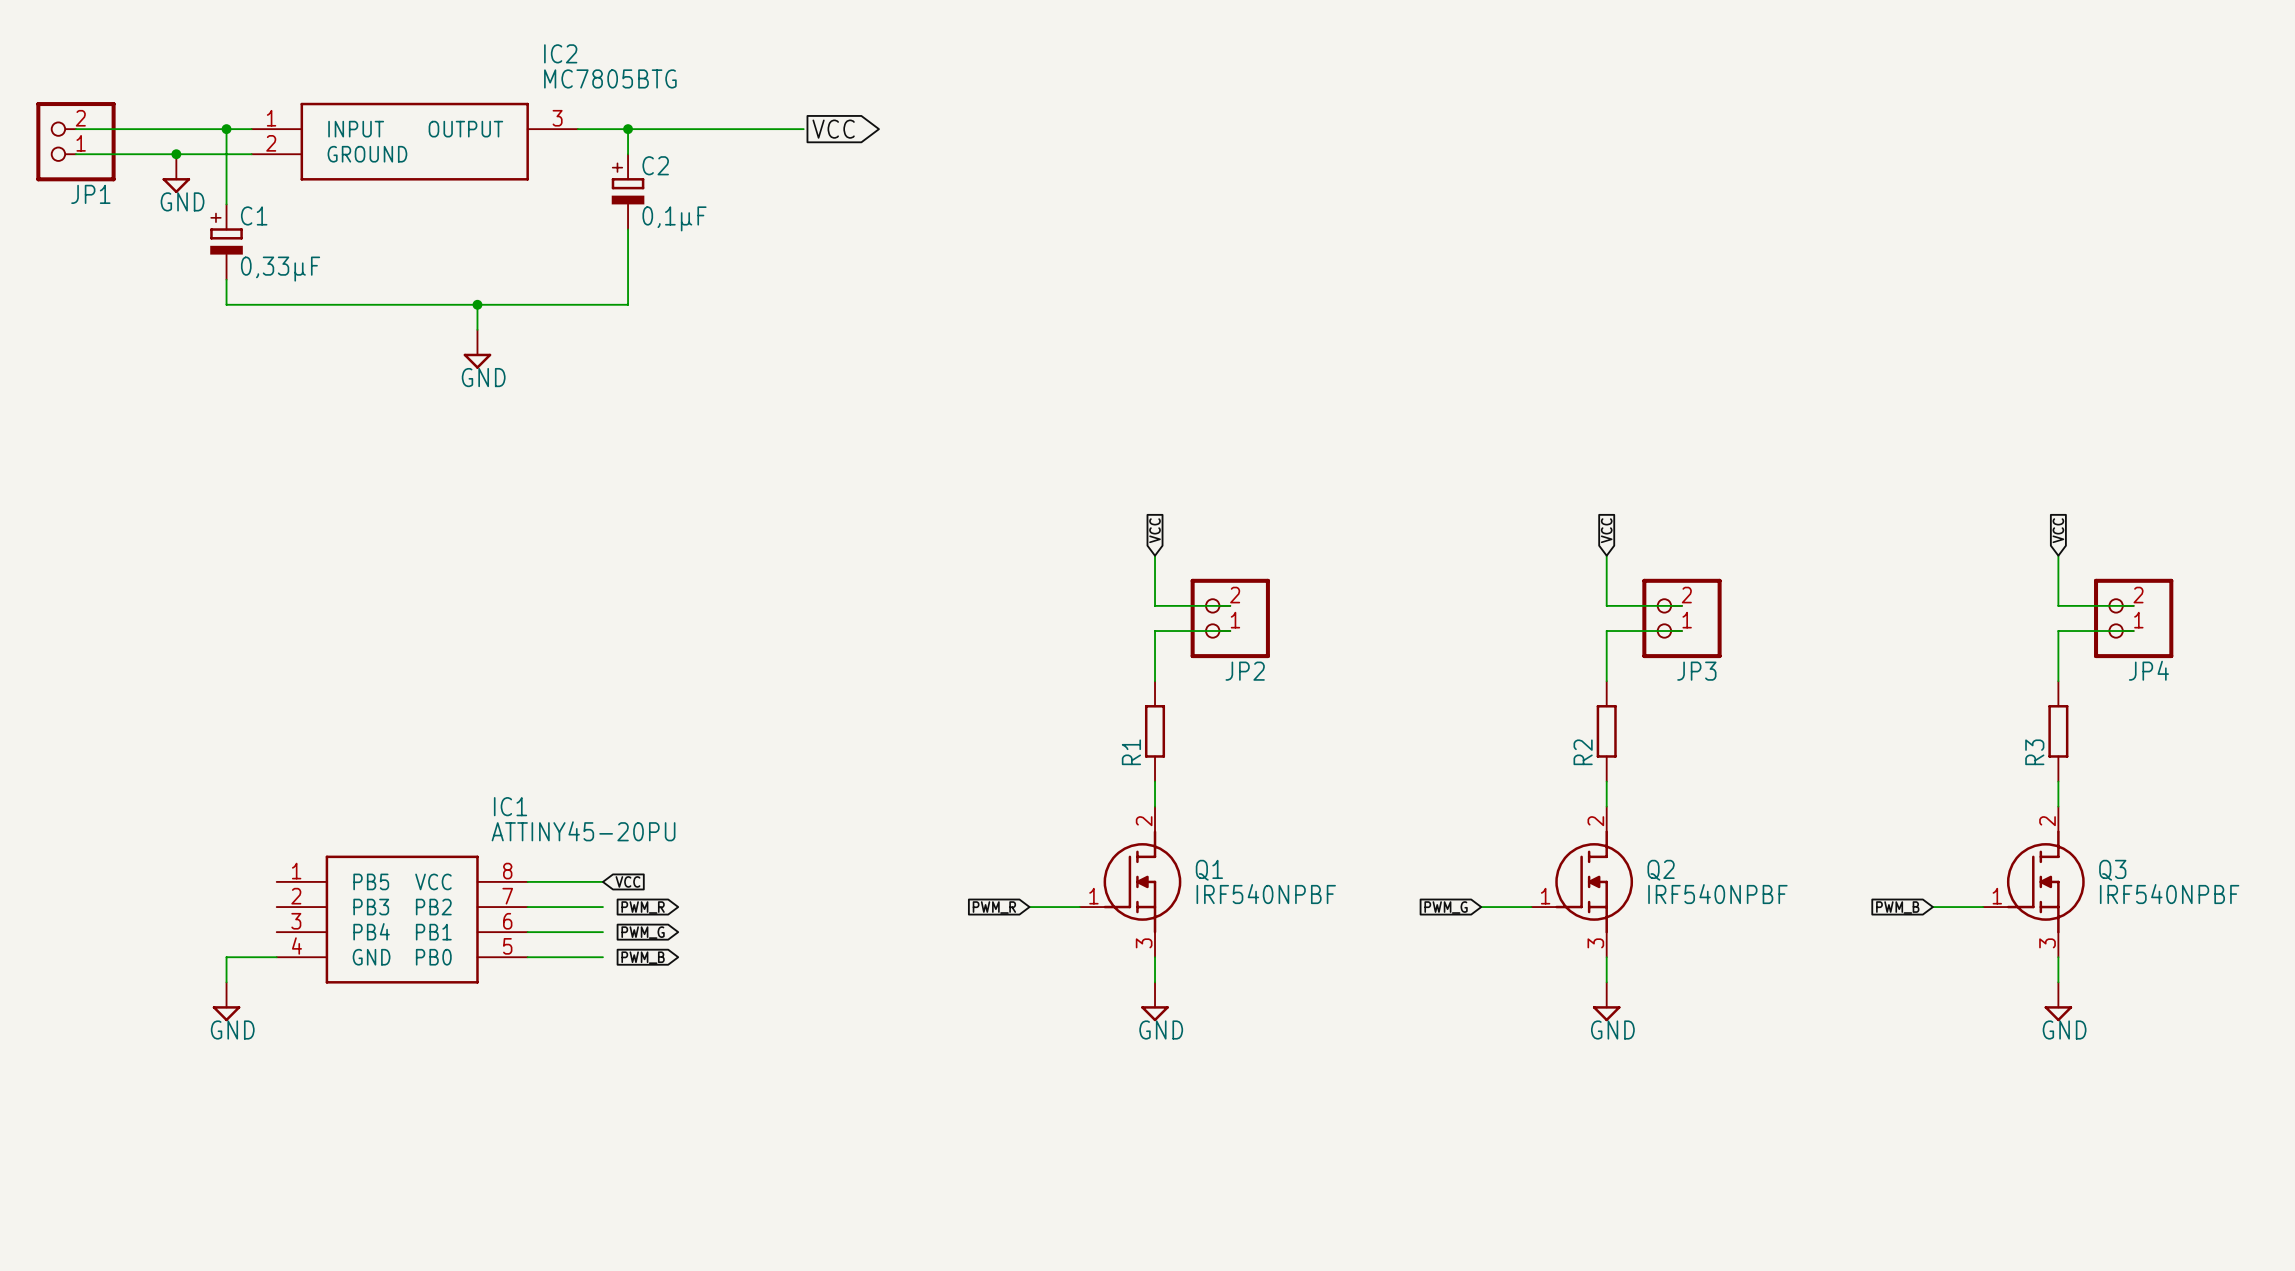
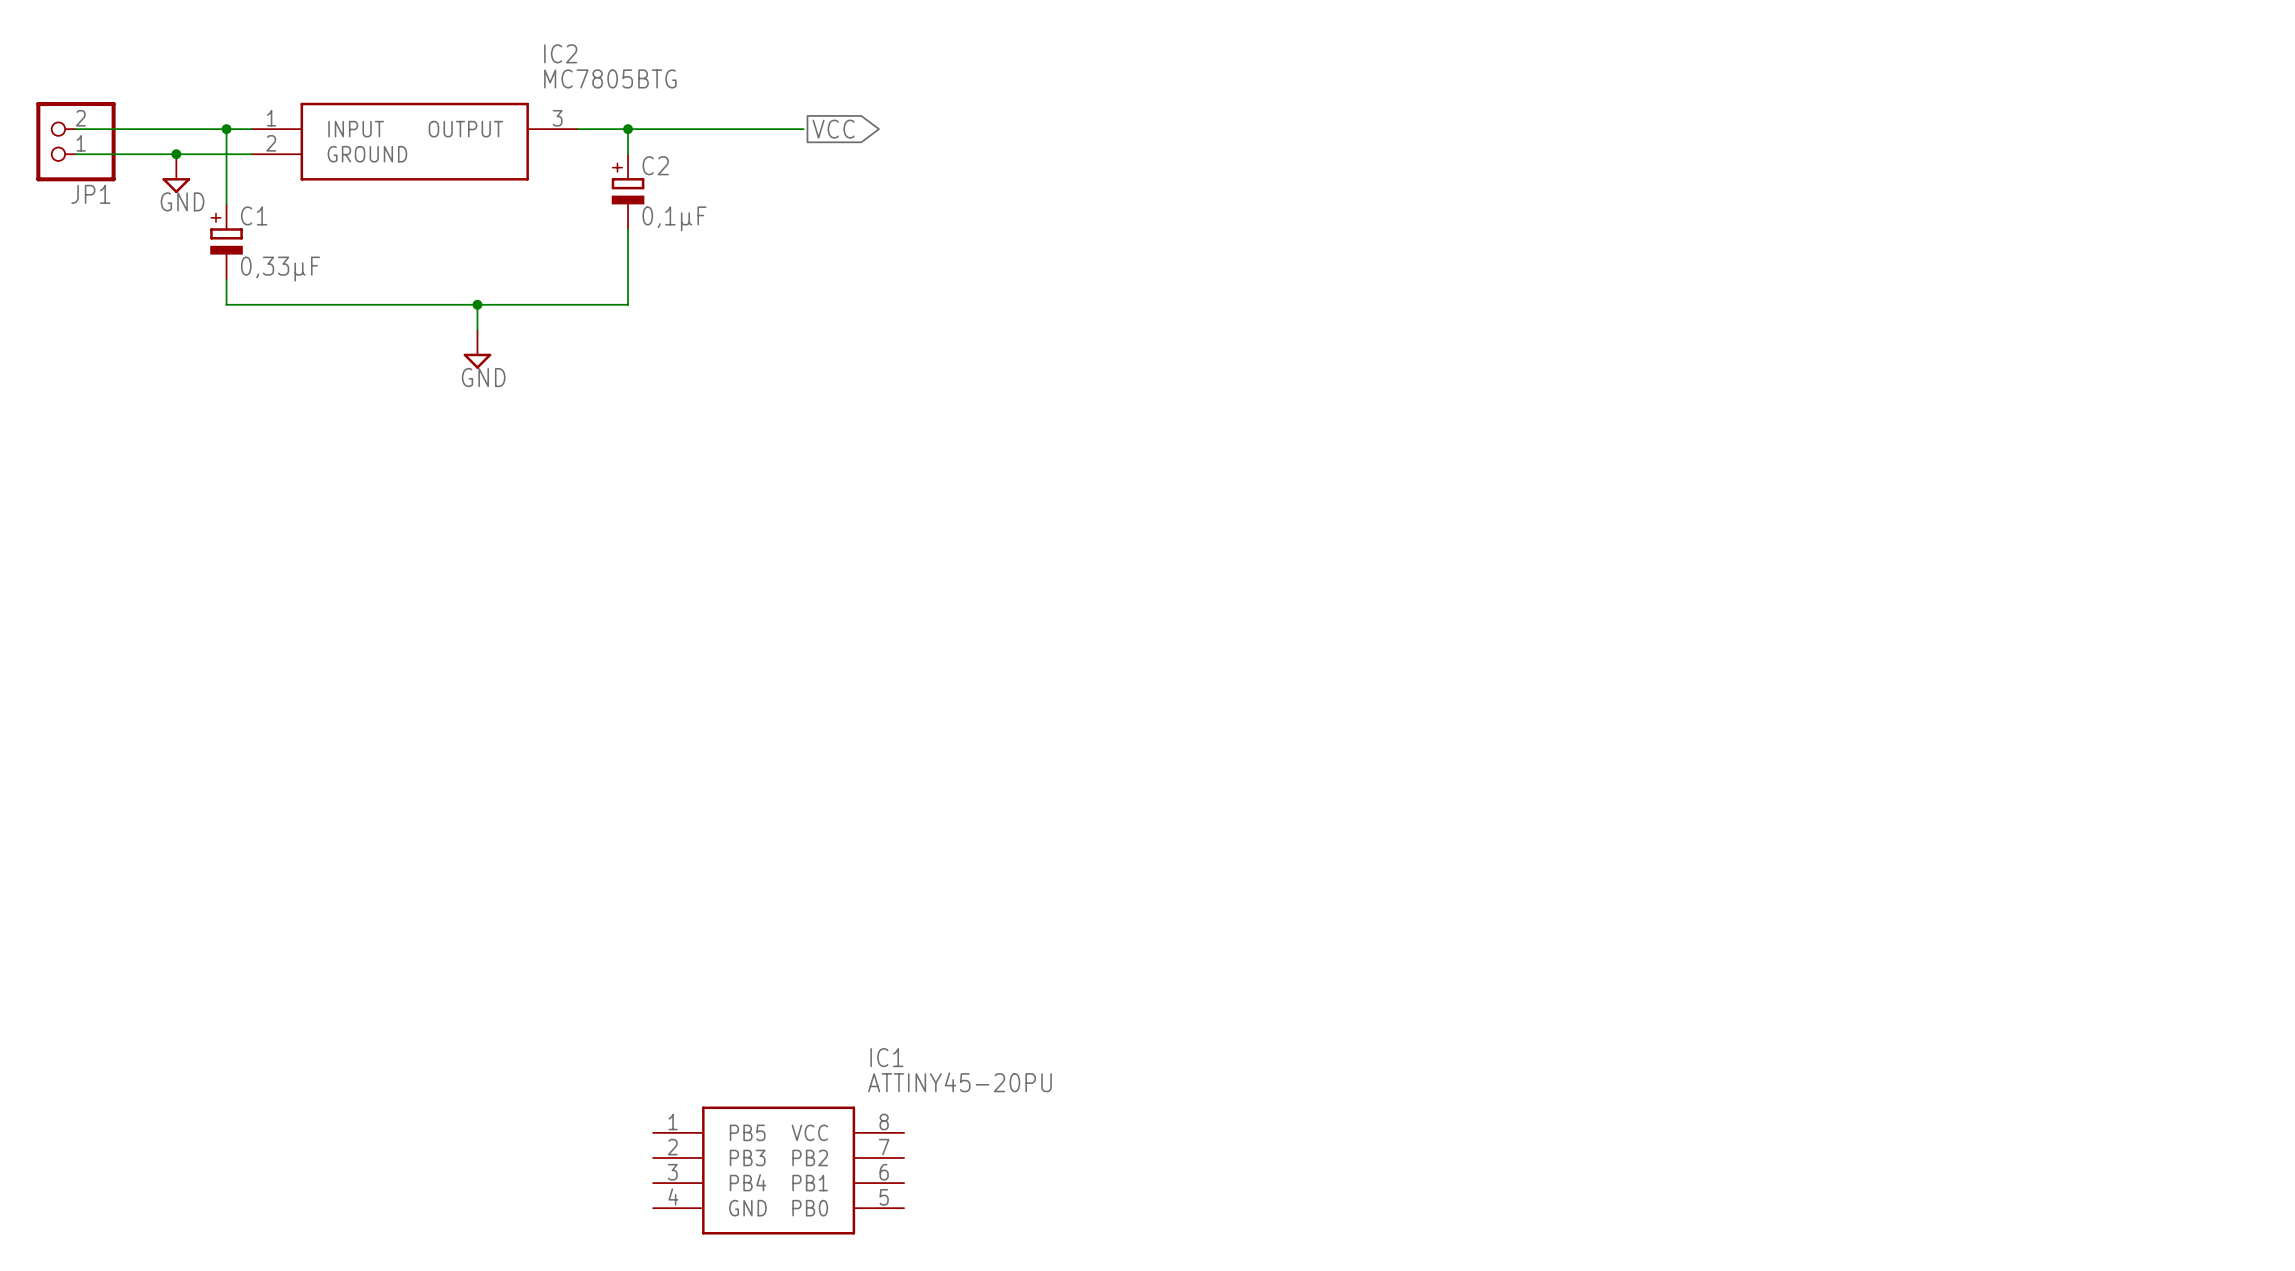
global label: VCC (1155, 530) -> none
global label: VCC (1606, 530) -> none
global label: VCC (2058, 530) -> none
wire: (1155, 555) (1155, 605) (1230, 605) -> none
wire: (1606, 555) (1606, 605) (1681, 605) -> none
wire: (2058, 555) (2058, 605) (2133, 605) -> none
JP2: (1230, 618) -> none
JP3: (1681, 618) -> none
JP4: (2133, 618) -> none
wire: (1230, 631) (1155, 631) (1155, 681) -> none
wire: (1681, 631) (1606, 631) (1606, 681) -> none
wire: (2133, 631) (2058, 631) (2058, 681) -> none
R1: (1155, 731) -> none
R2: (1606, 731) -> none
R3: (2058, 731) -> none
wire: (1155, 781) (1155, 806) -> none
wire: (1606, 781) (1606, 806) -> none
wire: (2058, 781) (2058, 806) -> none
wire: (527, 881) (602, 881) -> none
global label: VCC (627, 881) -> none
Q1: IRF540NPBF (1130, 881) -> none
Q2: IRF540NPBF (1582, 881) -> none
Q3: IRF540NPBF (2033, 881) -> none
wire: (527, 907) (602, 907) -> none
global label: PWM_R (643, 907) -> none
global label: PWM_R (994, 907) -> none
wire: (1029, 907) (1079, 907) -> none
global label: PWM_G (1446, 907) -> none
wire: (1481, 907) (1531, 907) -> none
global label: PWM_B (1897, 907) -> none
wire: (1932, 907) (1983, 907) -> none
IC1 position: (402, 919) -> (778, 1170)
wire: (527, 932) (602, 932) -> none
global label: PWM_G (643, 932) -> none
wire: (276, 957) (226, 957) (226, 982) -> none
wire: (527, 957) (602, 957) -> none
global label: PWM_B (643, 957) -> none
wire: (1155, 957) (1155, 982) -> none
wire: (1606, 957) (1606, 982) -> none
wire: (2058, 957) (2058, 982) -> none
power symbol: GND (226, 1001) -> none
power symbol: GND (1155, 1001) -> none
power symbol: GND (1606, 1001) -> none
power symbol: GND (2058, 1001) -> none

